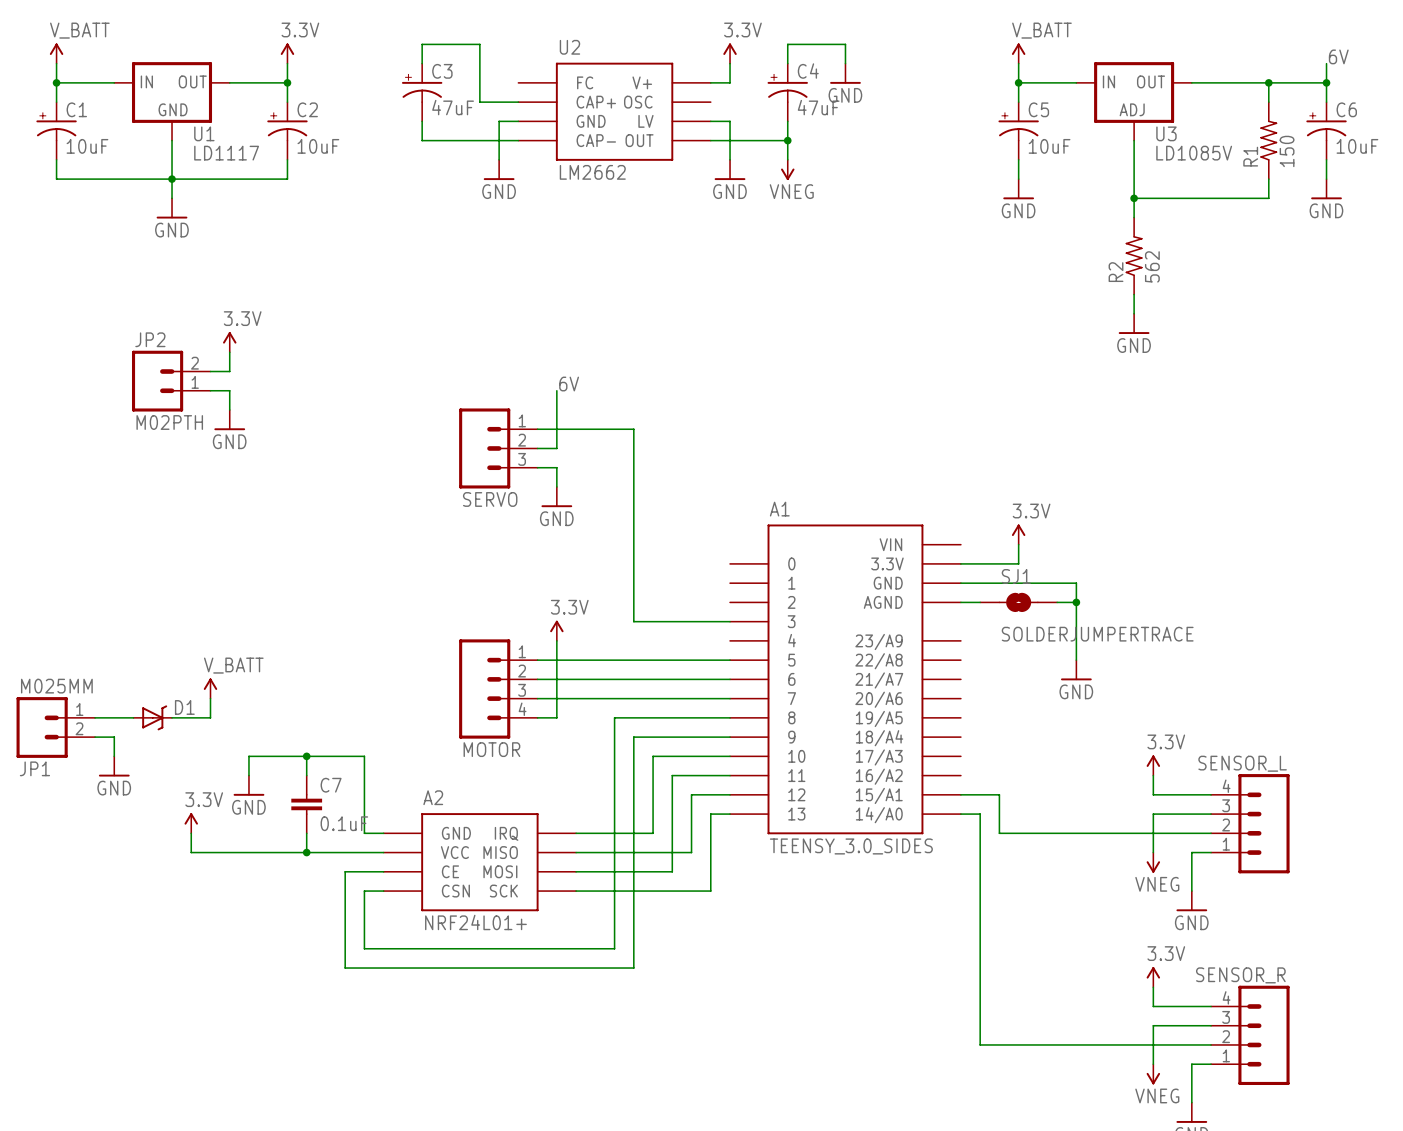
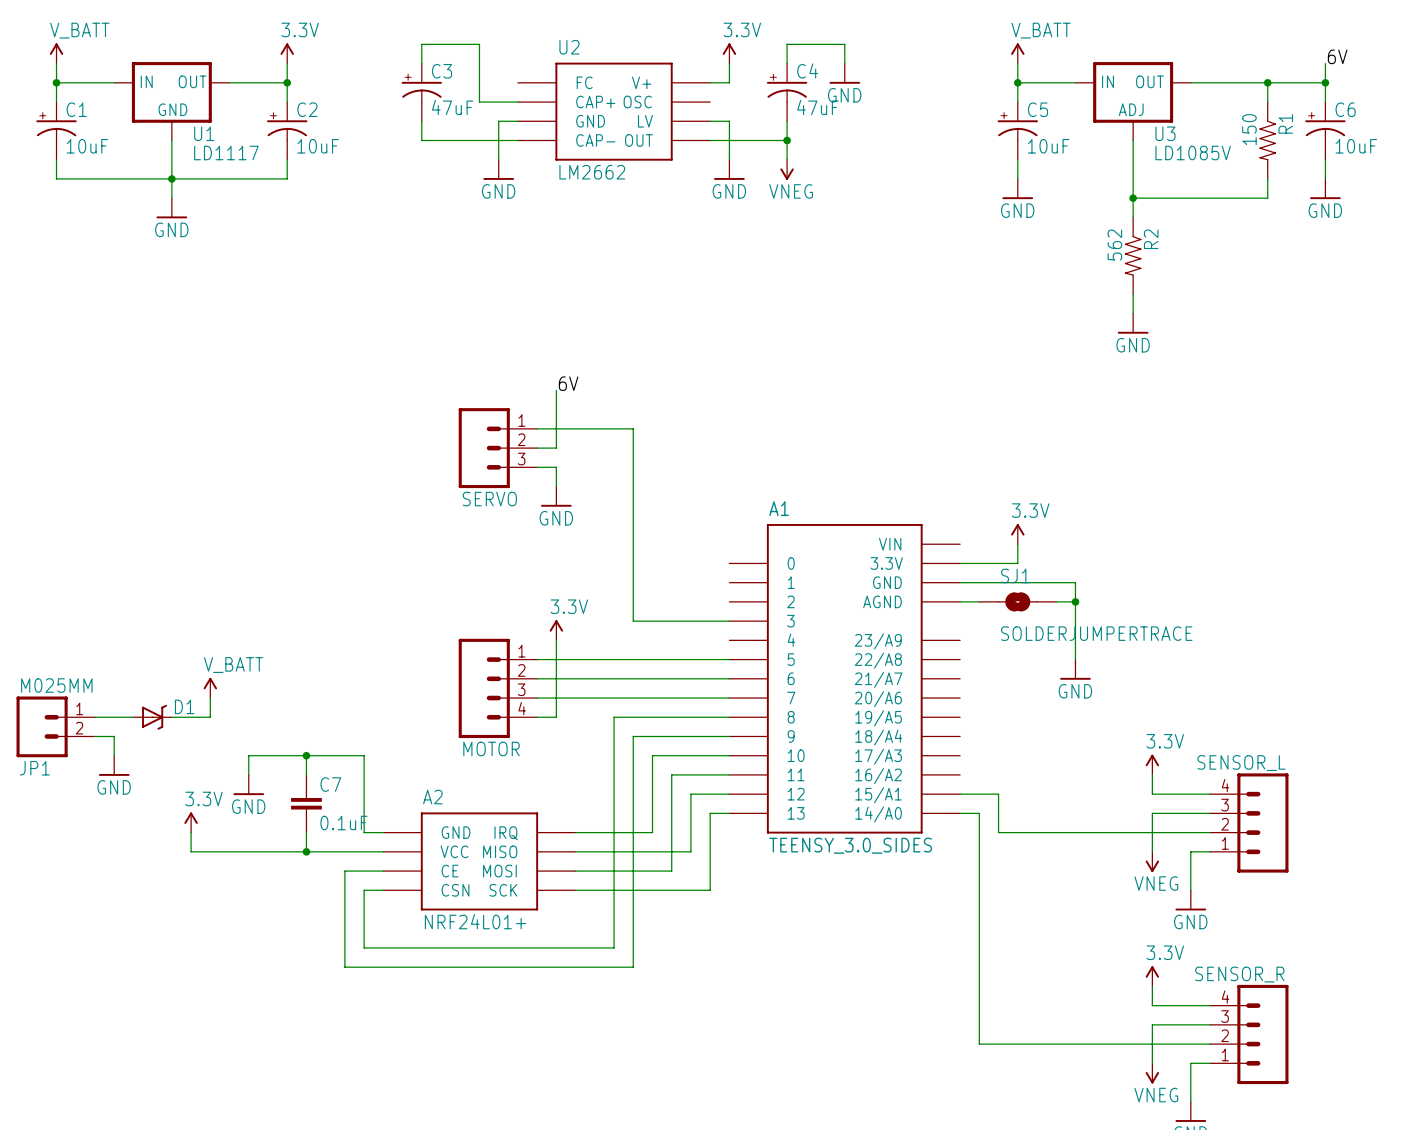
R1 rotation: 0° (1268, 140) -> 180° (1267, 140)
R2 rotation: 0° (1134, 256) -> 180° (1133, 255)
power symbol: 3.3V (229, 342) -> none
wire: (229, 352) (229, 371) (210, 371) -> none
JP2: M02PTH (171, 381) -> none
wire: (210, 390) (229, 390) (229, 410) -> none
power symbol: GND (229, 420) -> none

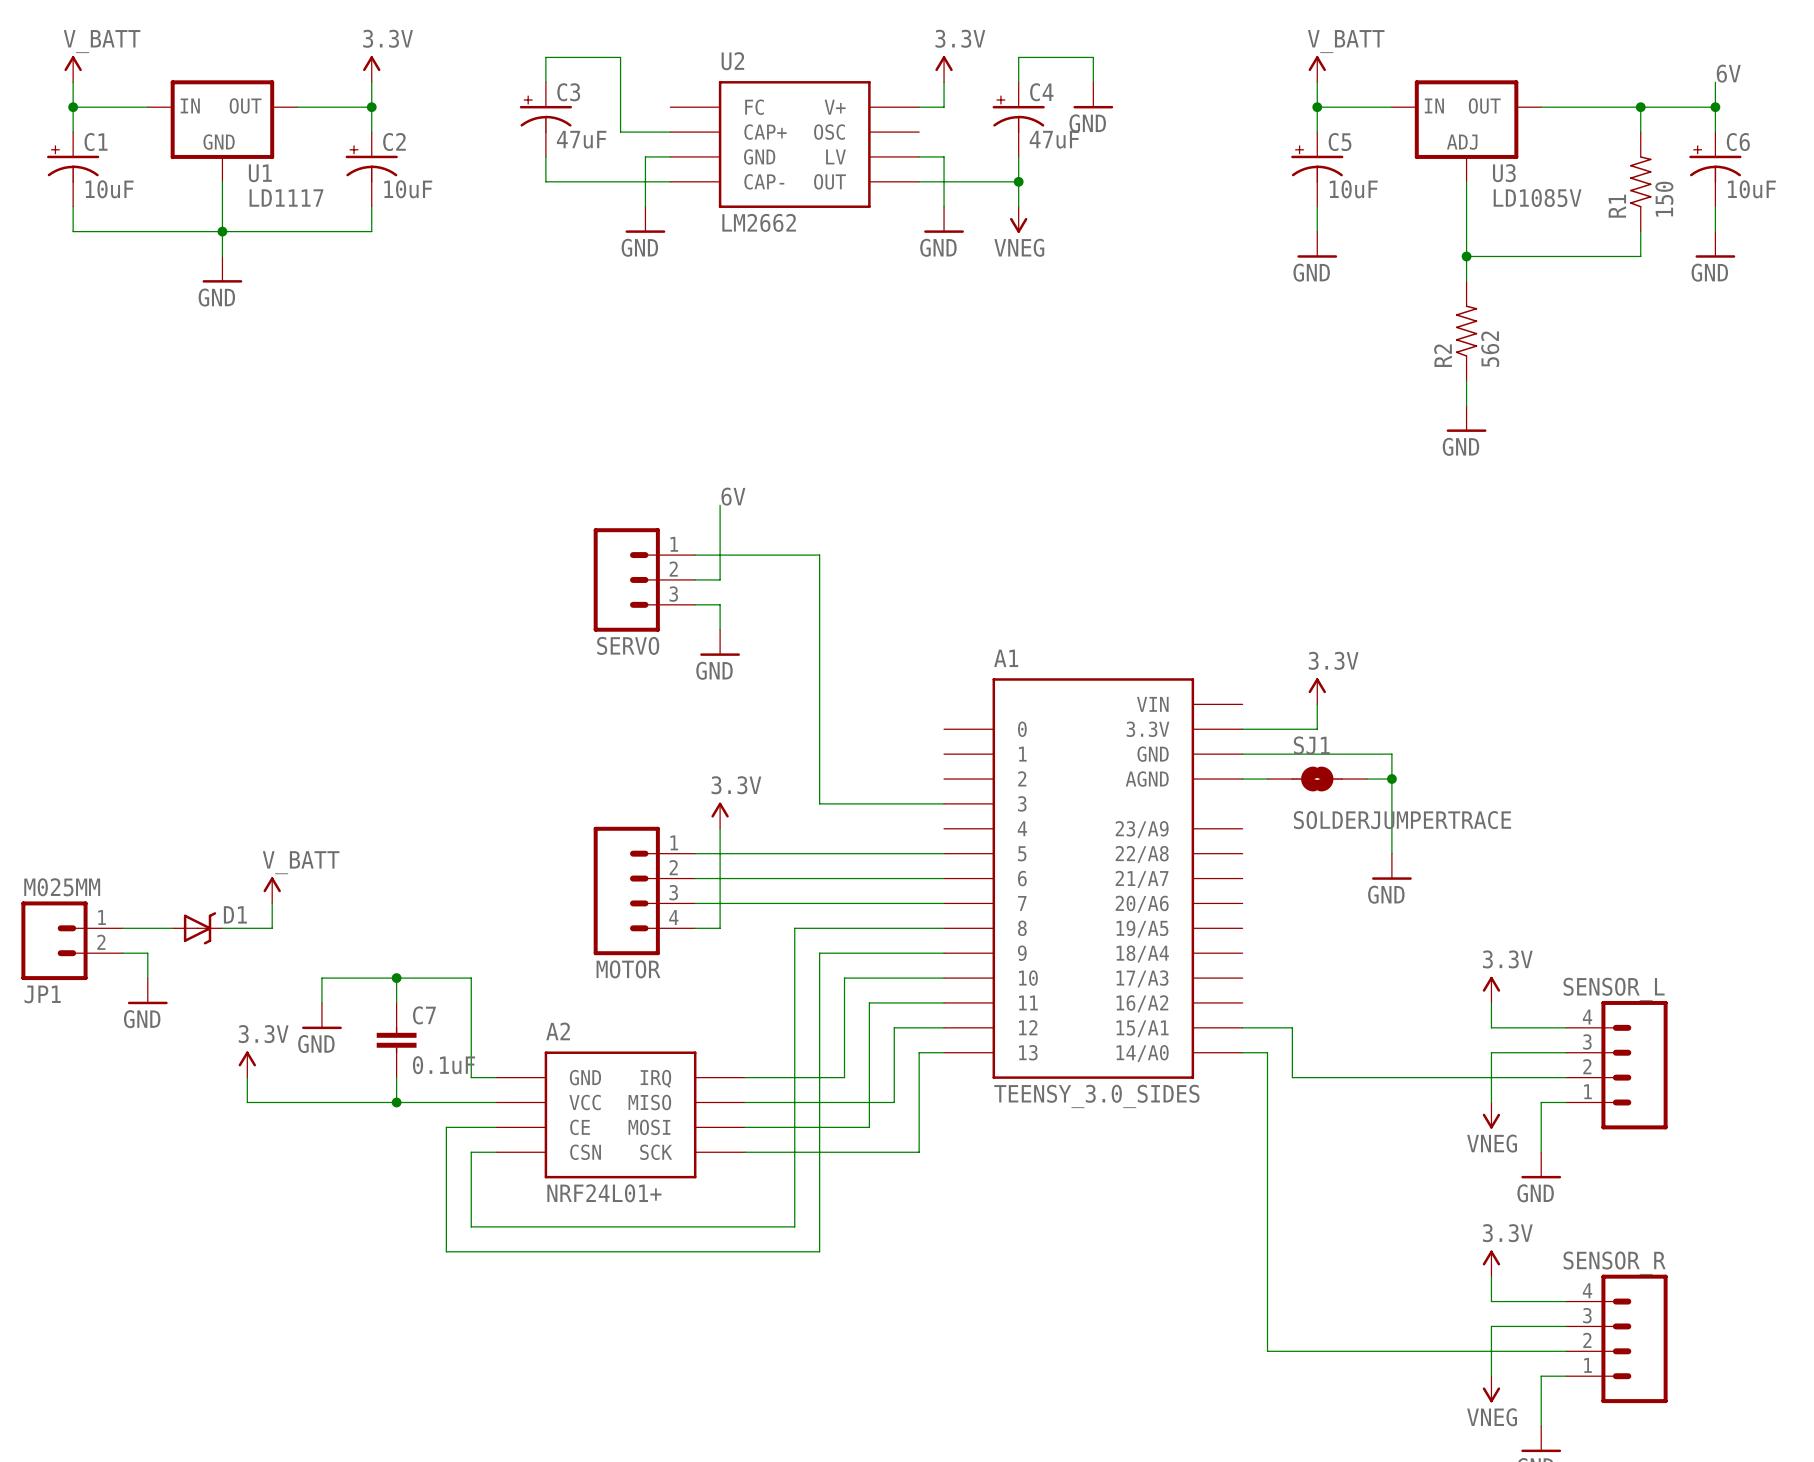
R1 rotation: 0° (1267, 140) -> 180° (1640, 181)
R2 rotation: 0° (1133, 255) -> 180° (1466, 331)

